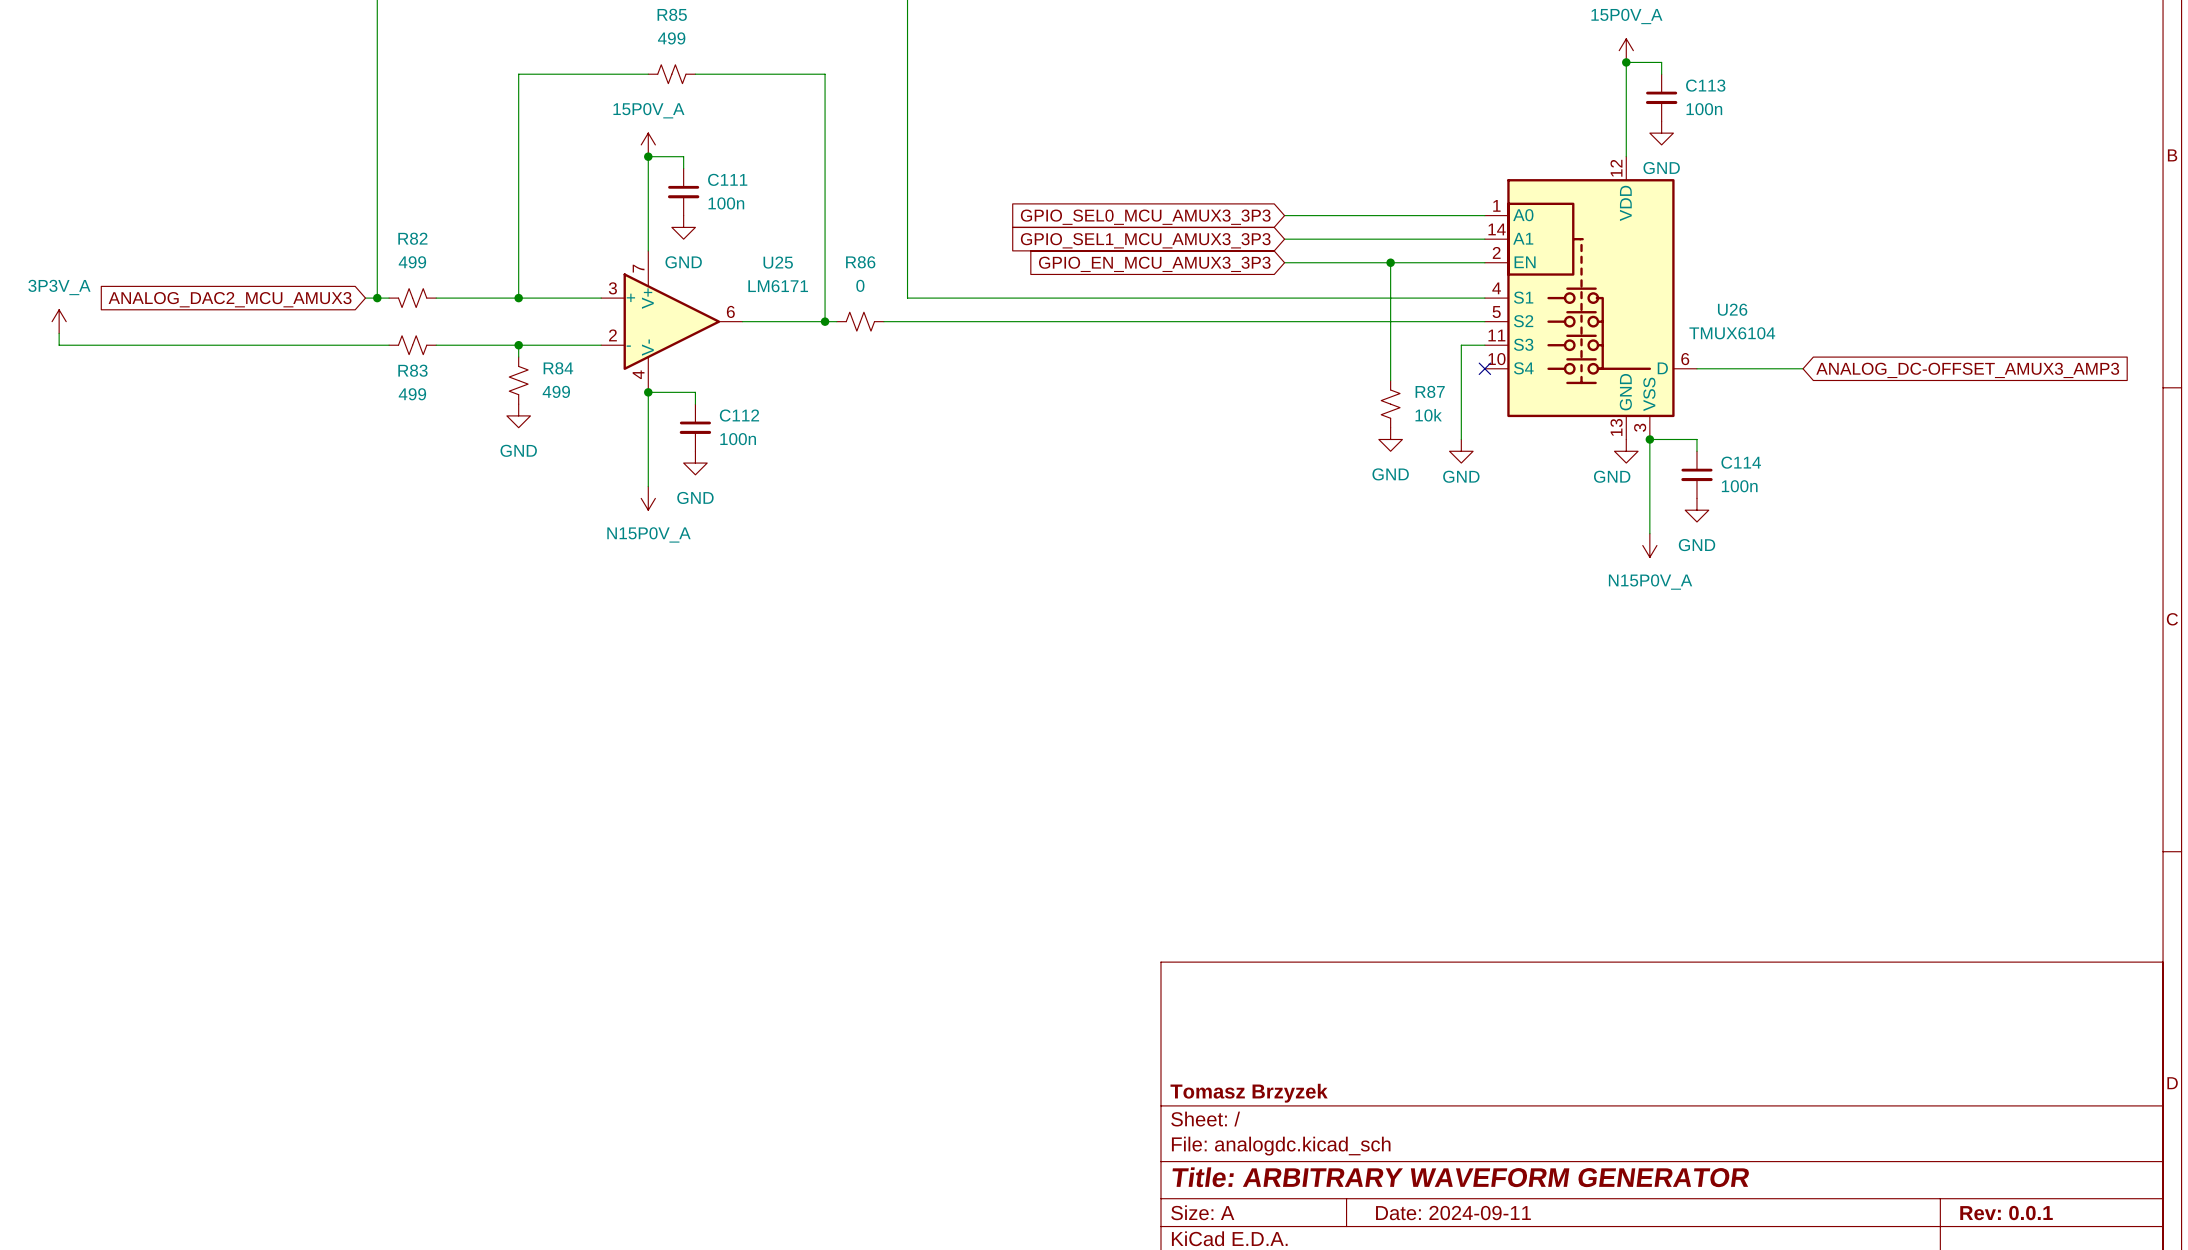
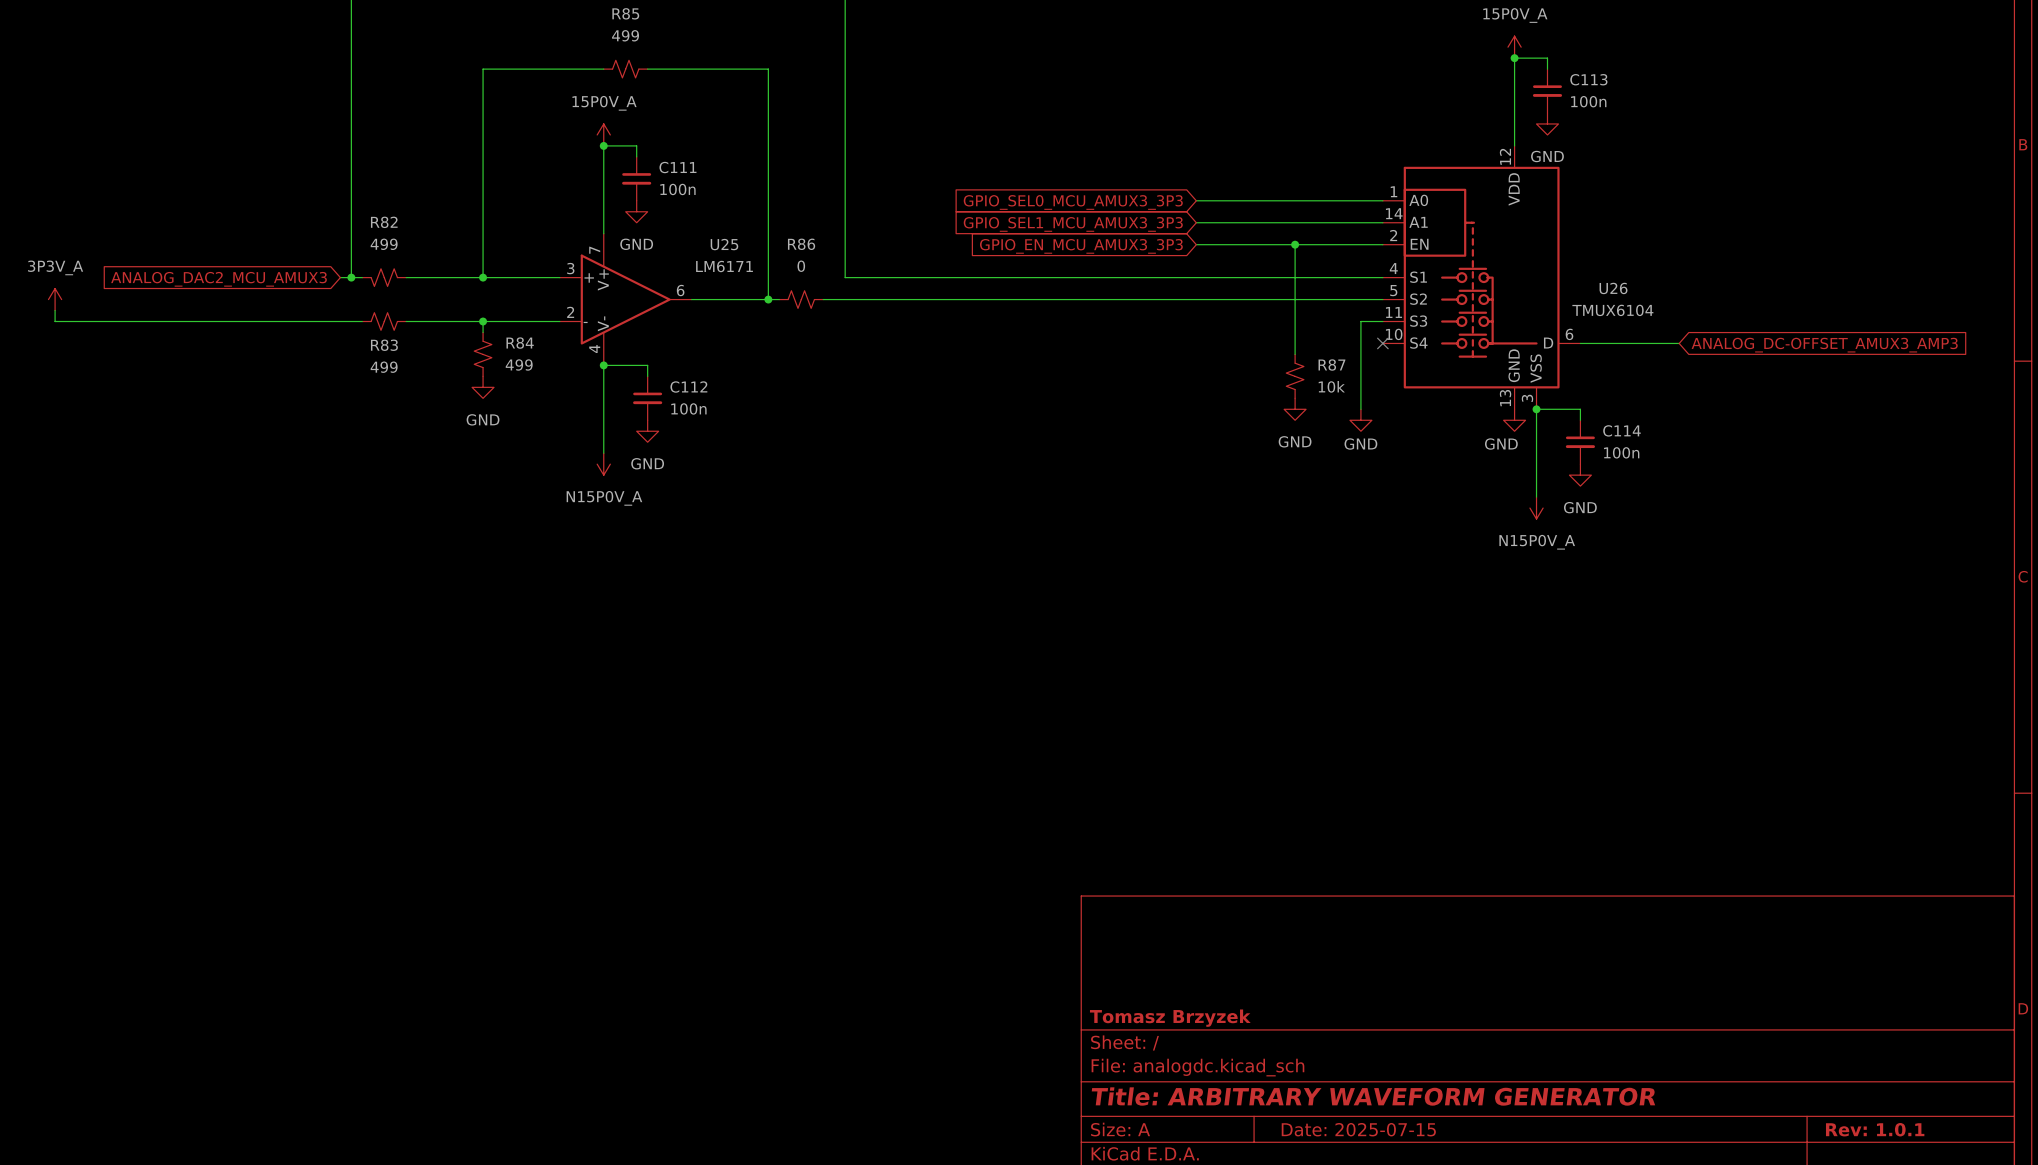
title block: Date: 2024-09-11 (1453, 1213) -> Date: 2025-07-15 (1358, 1129)
title block: Rev: 0.0.1 (2006, 1213) -> Rev: 1.0.1 (1875, 1129)

